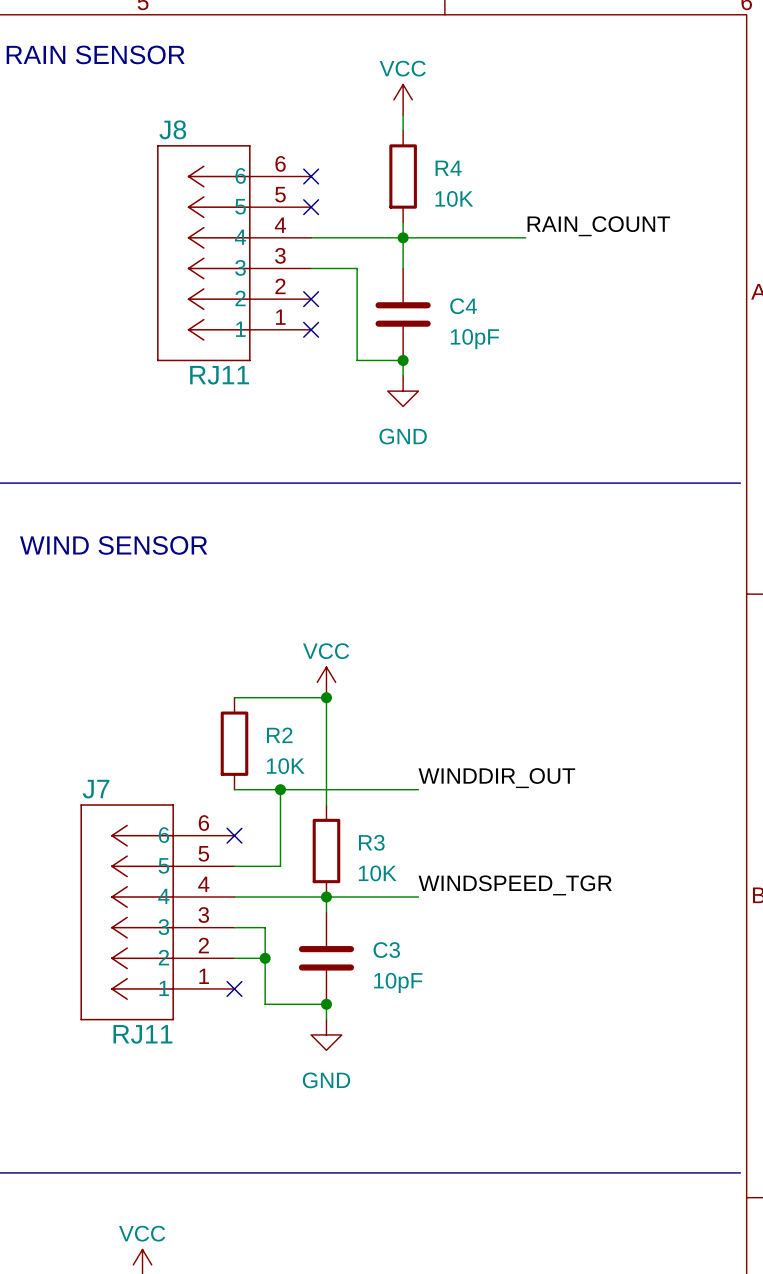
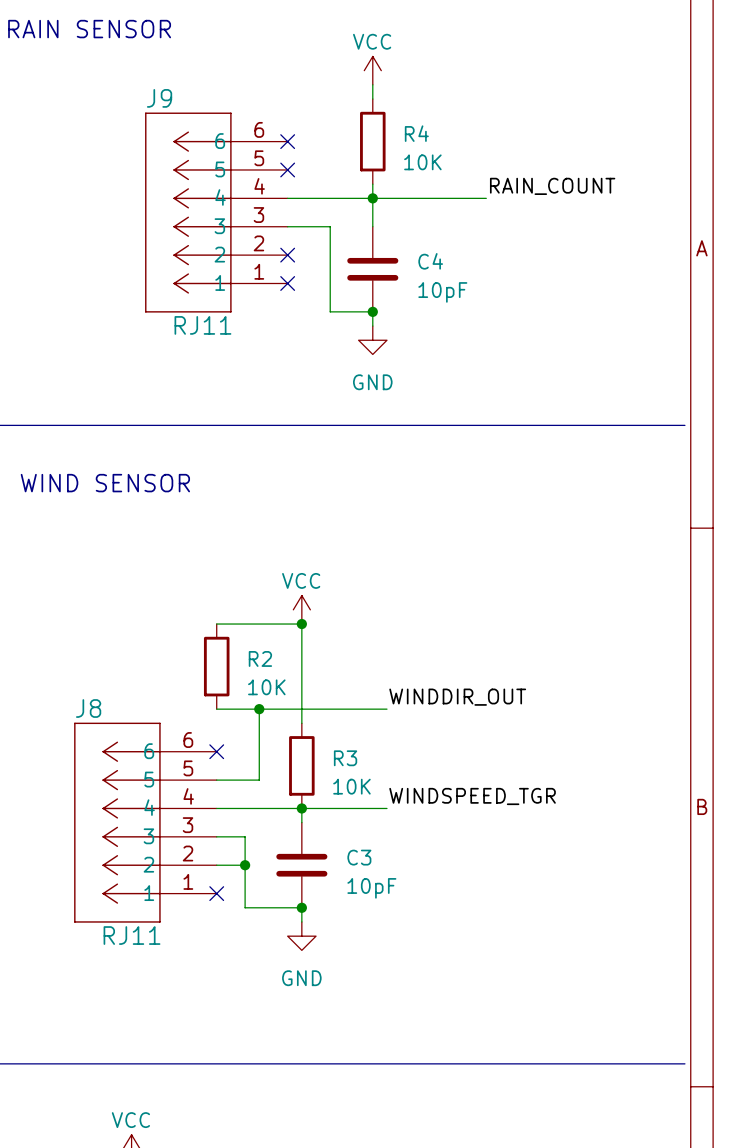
J8 name: J8 (172, 129) -> J9 (159, 98)
J7 name: J7 (96, 789) -> J8 (88, 708)

